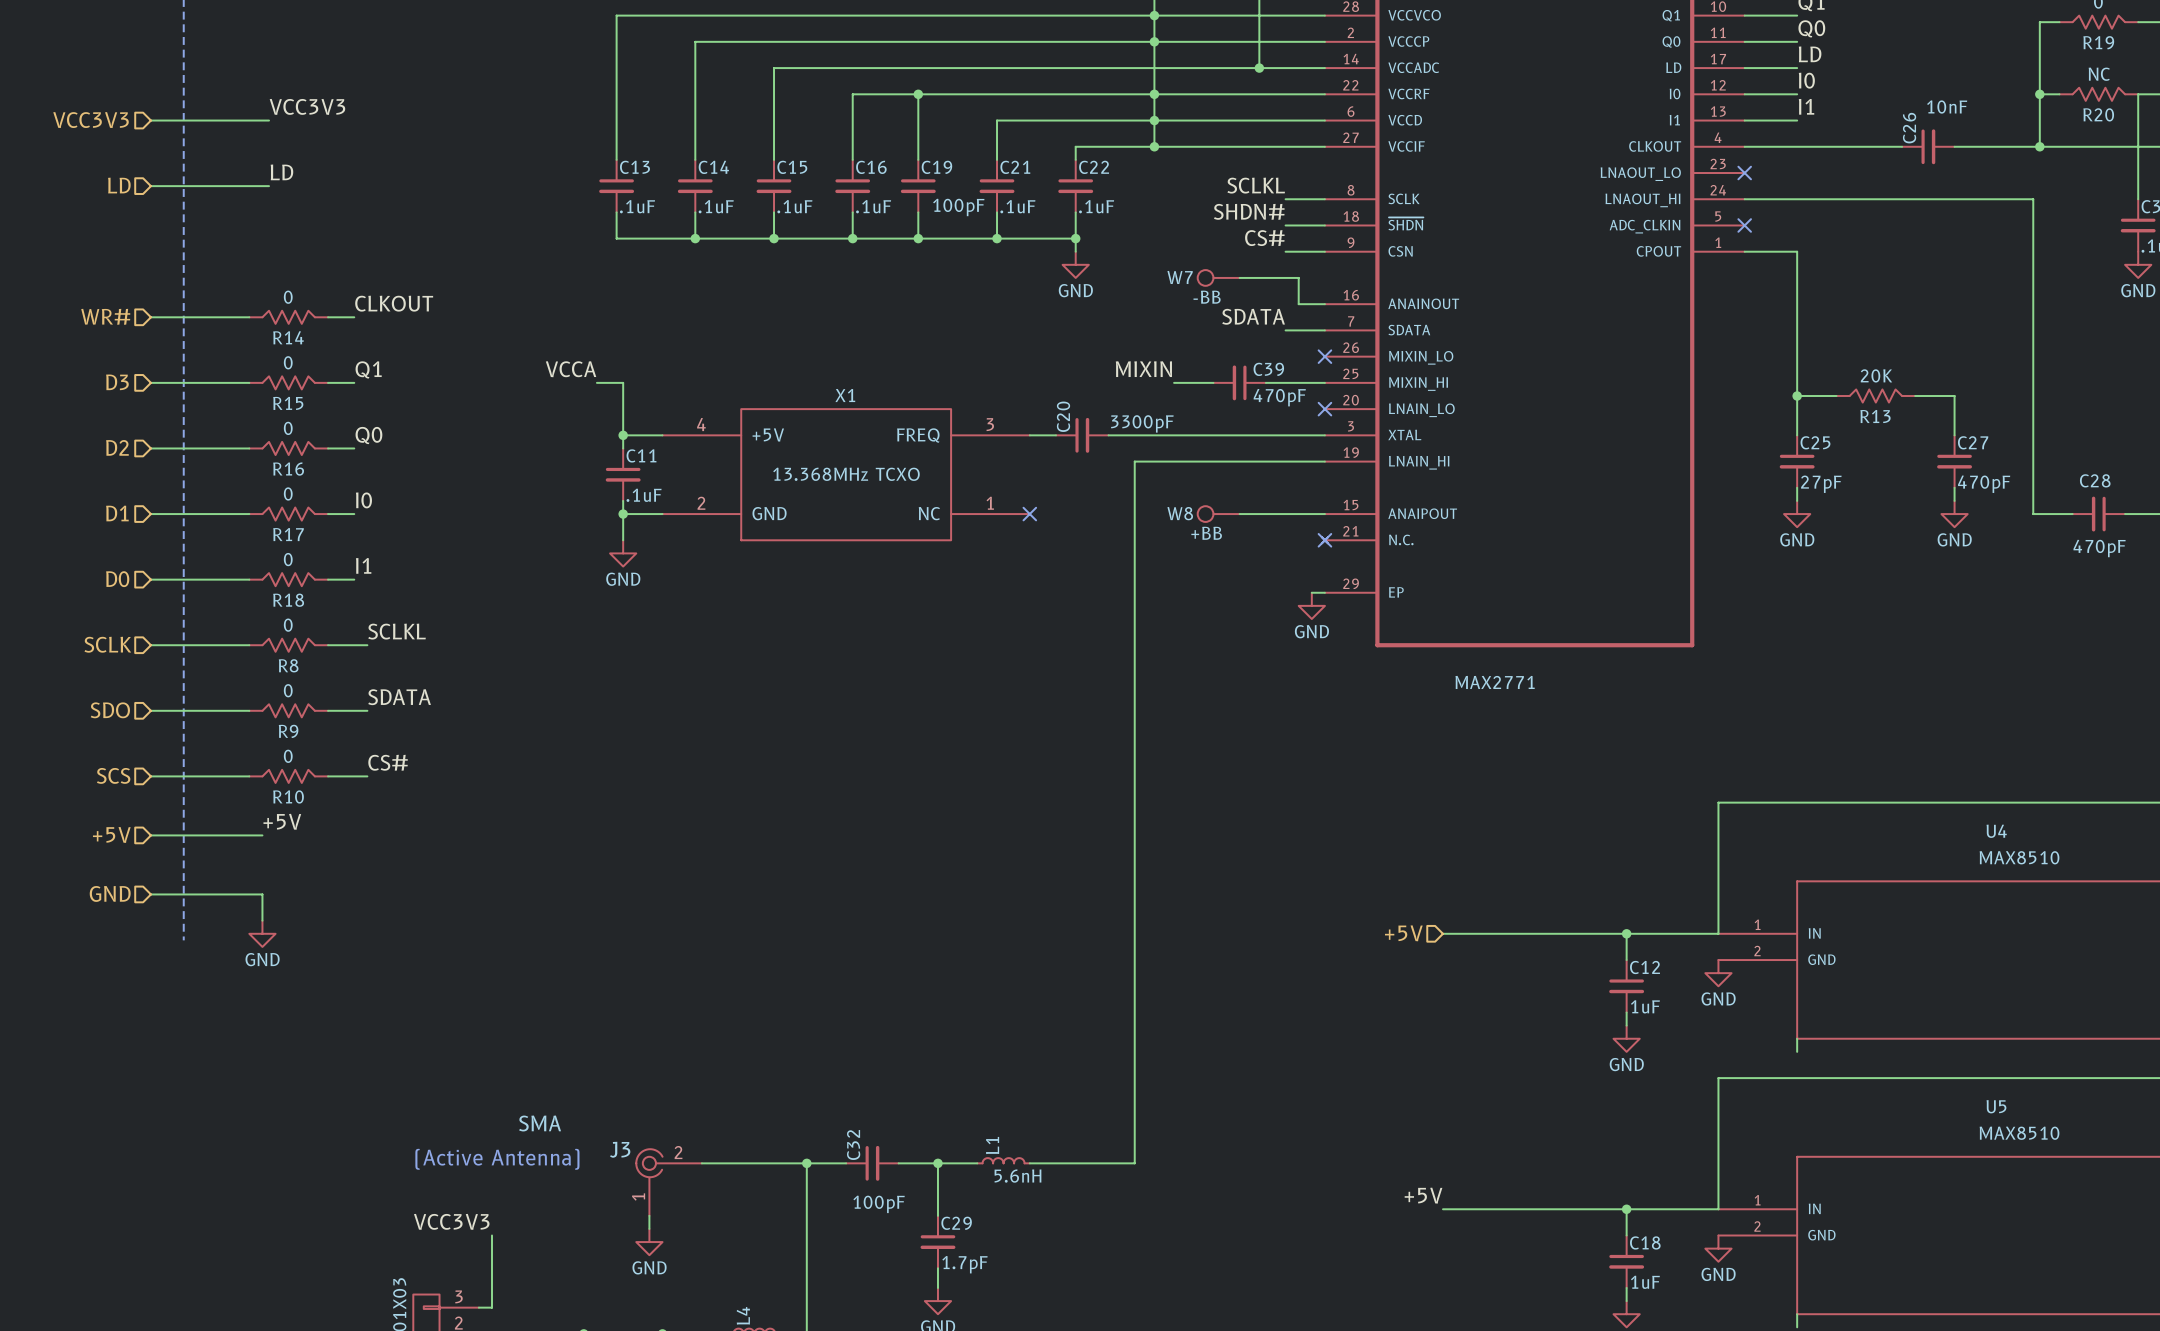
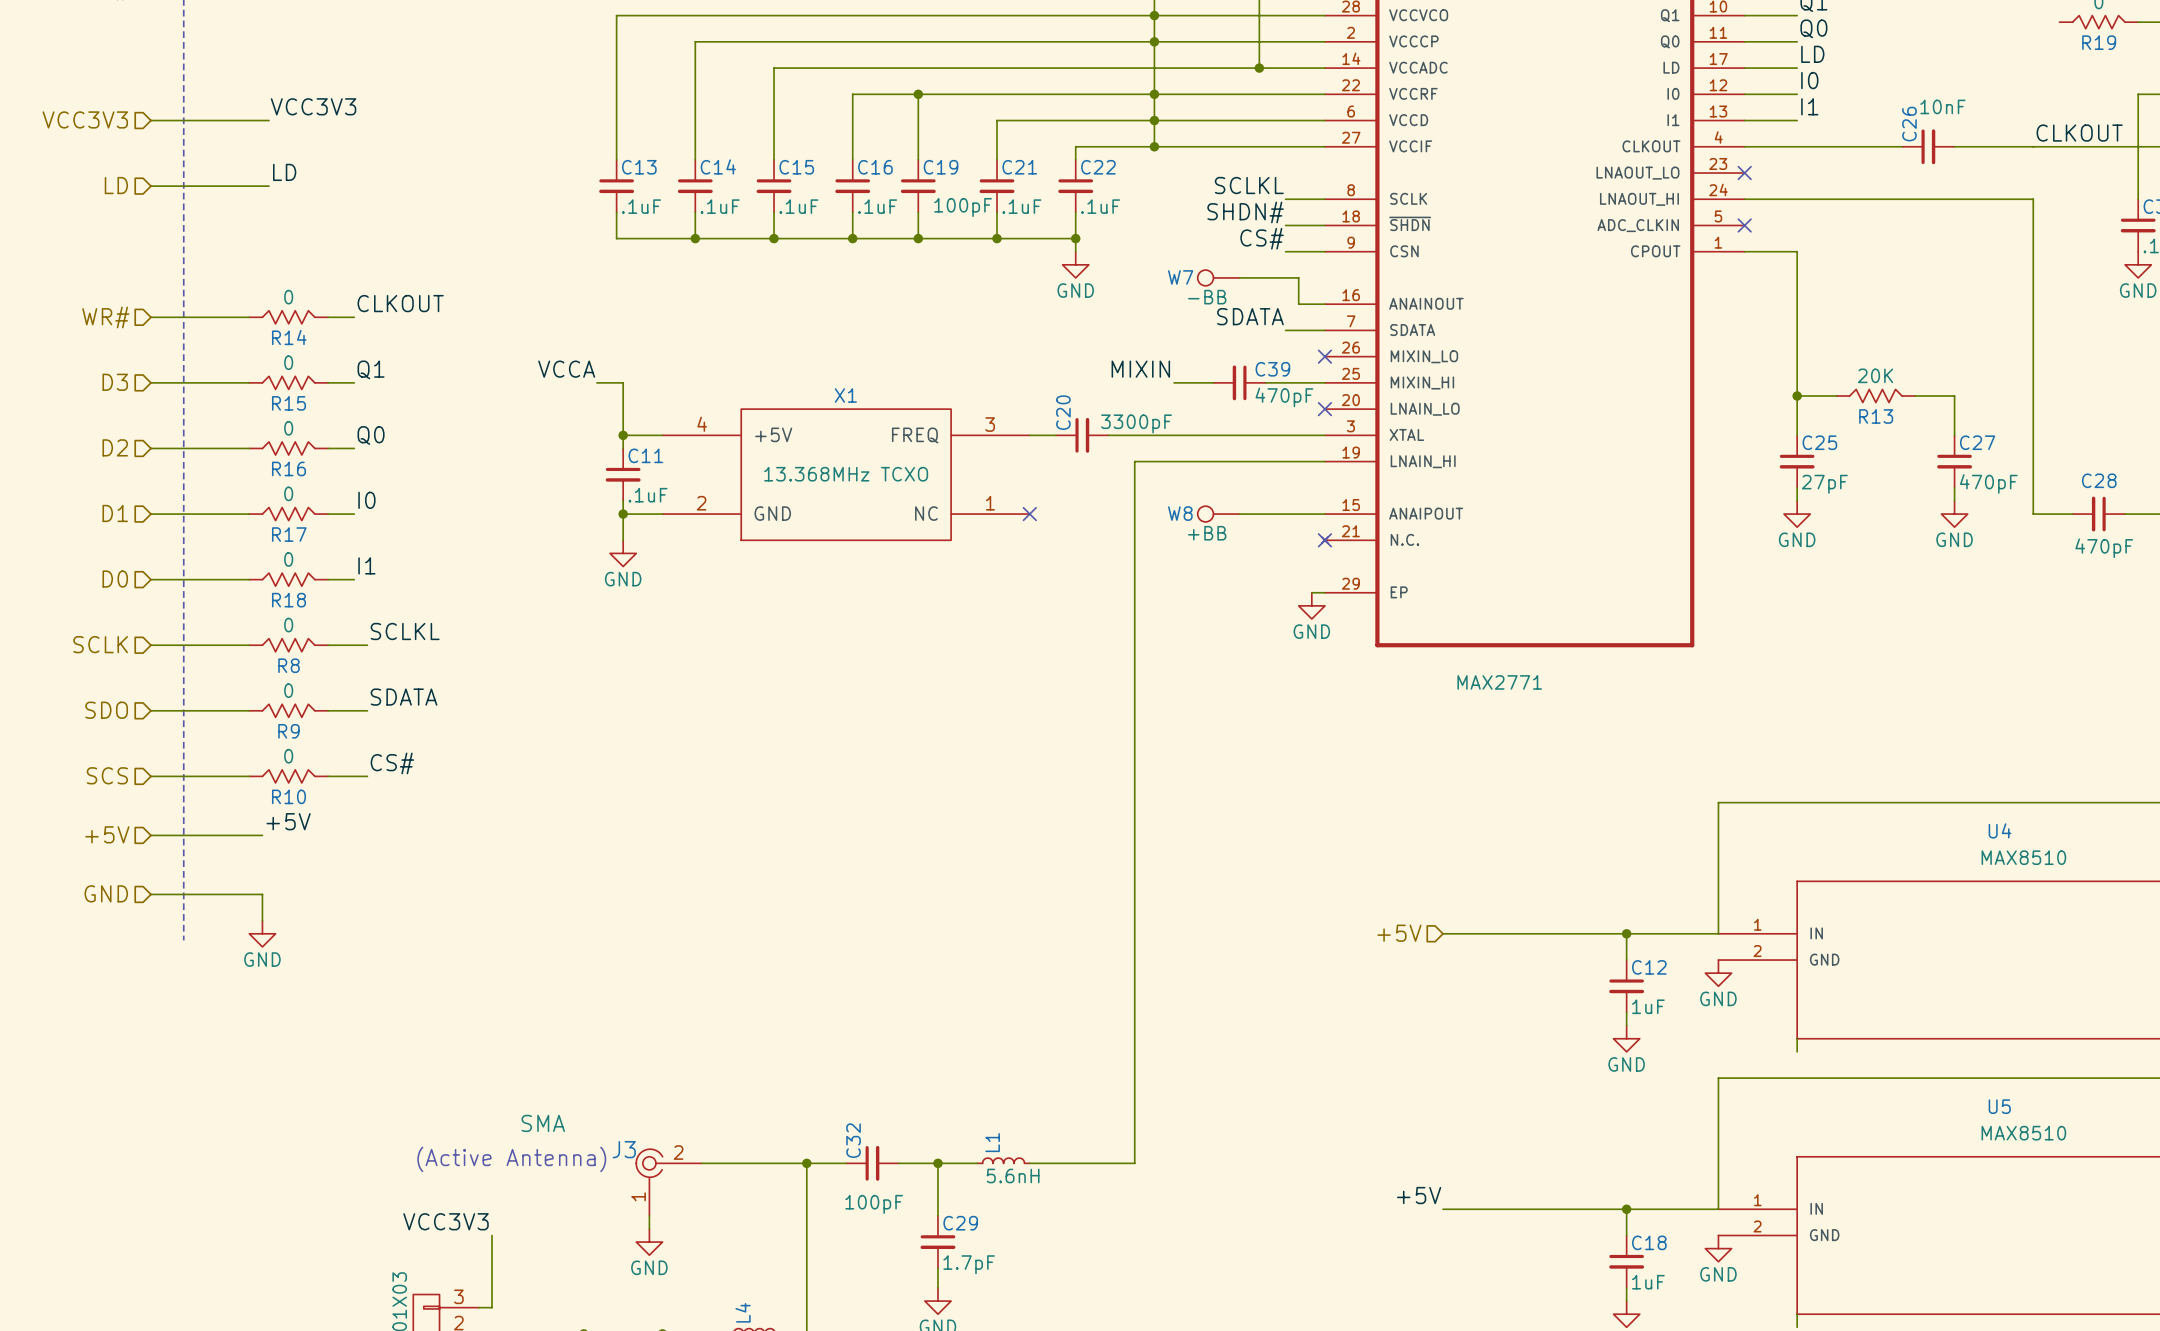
wire: (2059, 22) (2039, 22) (2039, 146) -> none
wire: (2039, 94) (2059, 94) -> none
junction: (2039, 94) -> none
R20: NC (2098, 94) -> none
label: none -> CLKOUT (2079, 133)
junction: (2039, 146) -> none

